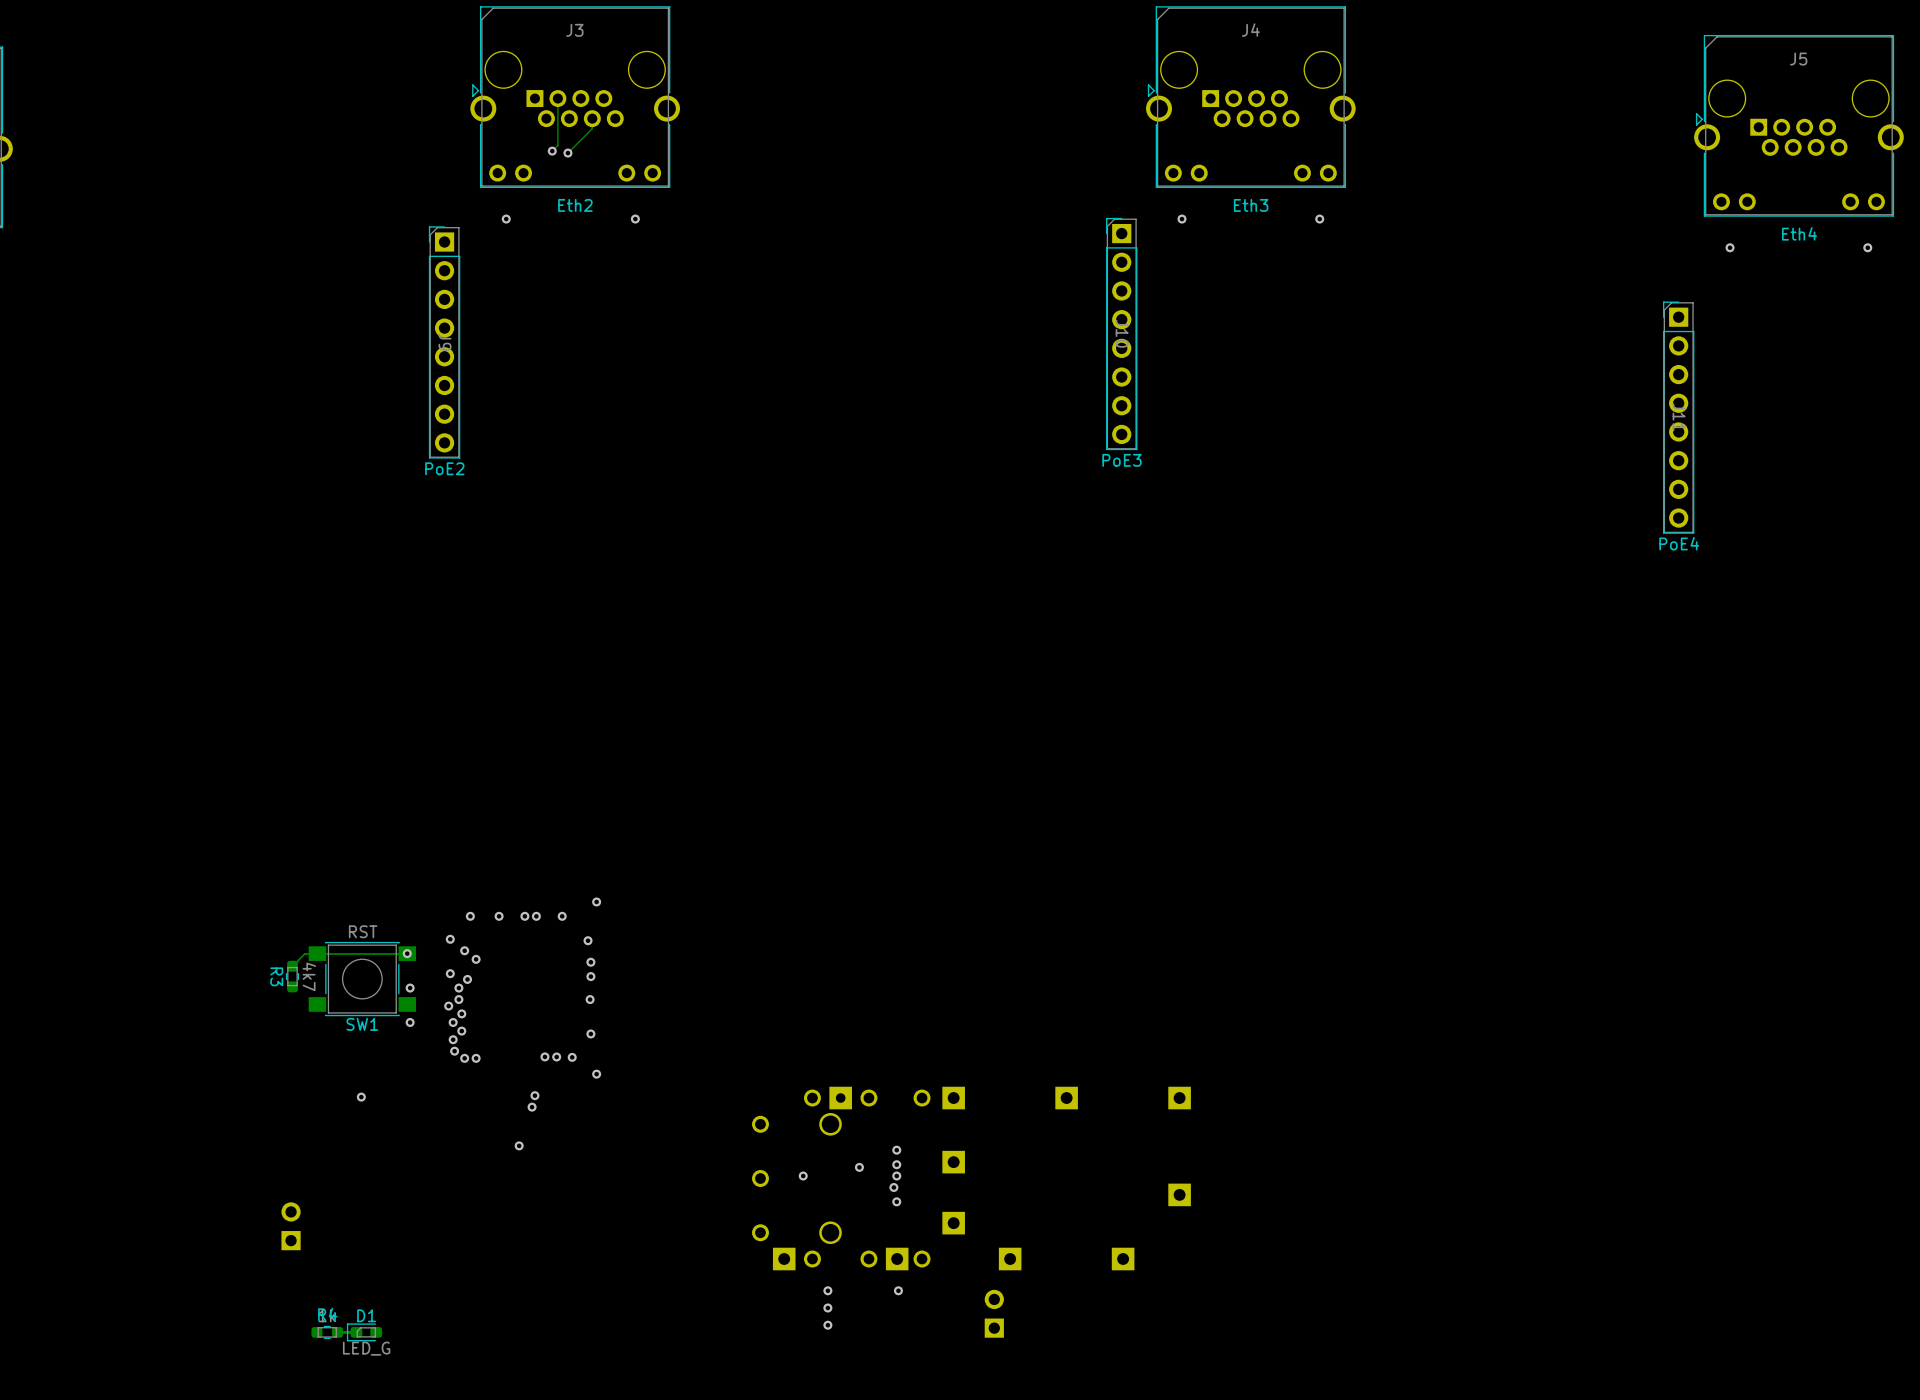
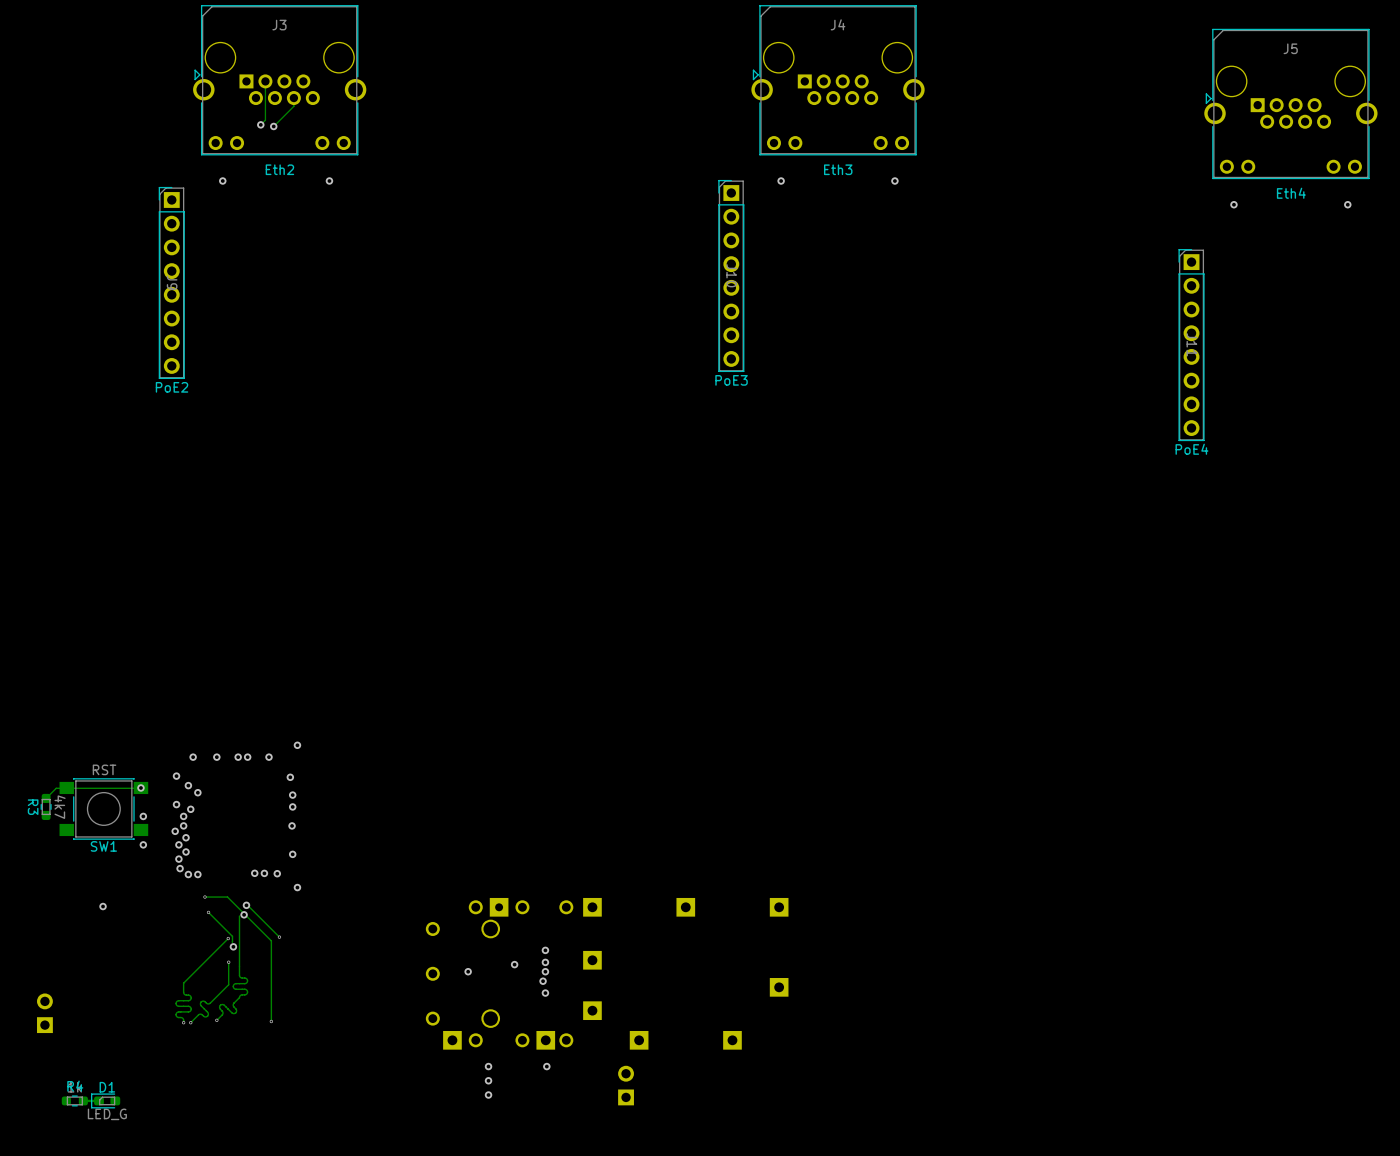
track: none -> (204, 897) (227, 897) (271, 940) (271, 1021)
via: none -> (204, 897)
track: none -> (247, 905) (279, 937)
track: none -> (208, 912) (232, 936) (232, 942)
via: none -> (208, 912)
track: none -> (239, 916) (239, 975) (246, 978) (247, 981) (245, 983) (235, 983) (233, 986) (235, 989) (245, 989) (247, 992) (240, 995) (233, 1003) (236, 1010) (235, 1013) (232, 1012) (223, 1004) (220, 1005) (222, 1013) (216, 1020)
via: none -> (279, 937)
track: none -> (228, 938) (183, 983) (184, 993) (191, 997) (189, 1000) (178, 1000) (176, 1002) (177, 1006) (190, 1008) (189, 1011) (176, 1013) (177, 1016) (183, 1018) (183, 1022)
via: none -> (228, 938)
track: none -> (228, 962) (228, 984) (209, 1003) (201, 1001) (200, 1005) (208, 1015) (205, 1016) (199, 1014) (190, 1022)
via: none -> (228, 962)
via: none -> (216, 1020)
via: none -> (271, 1021)
via: none -> (183, 1022)
via: none -> (190, 1022)

